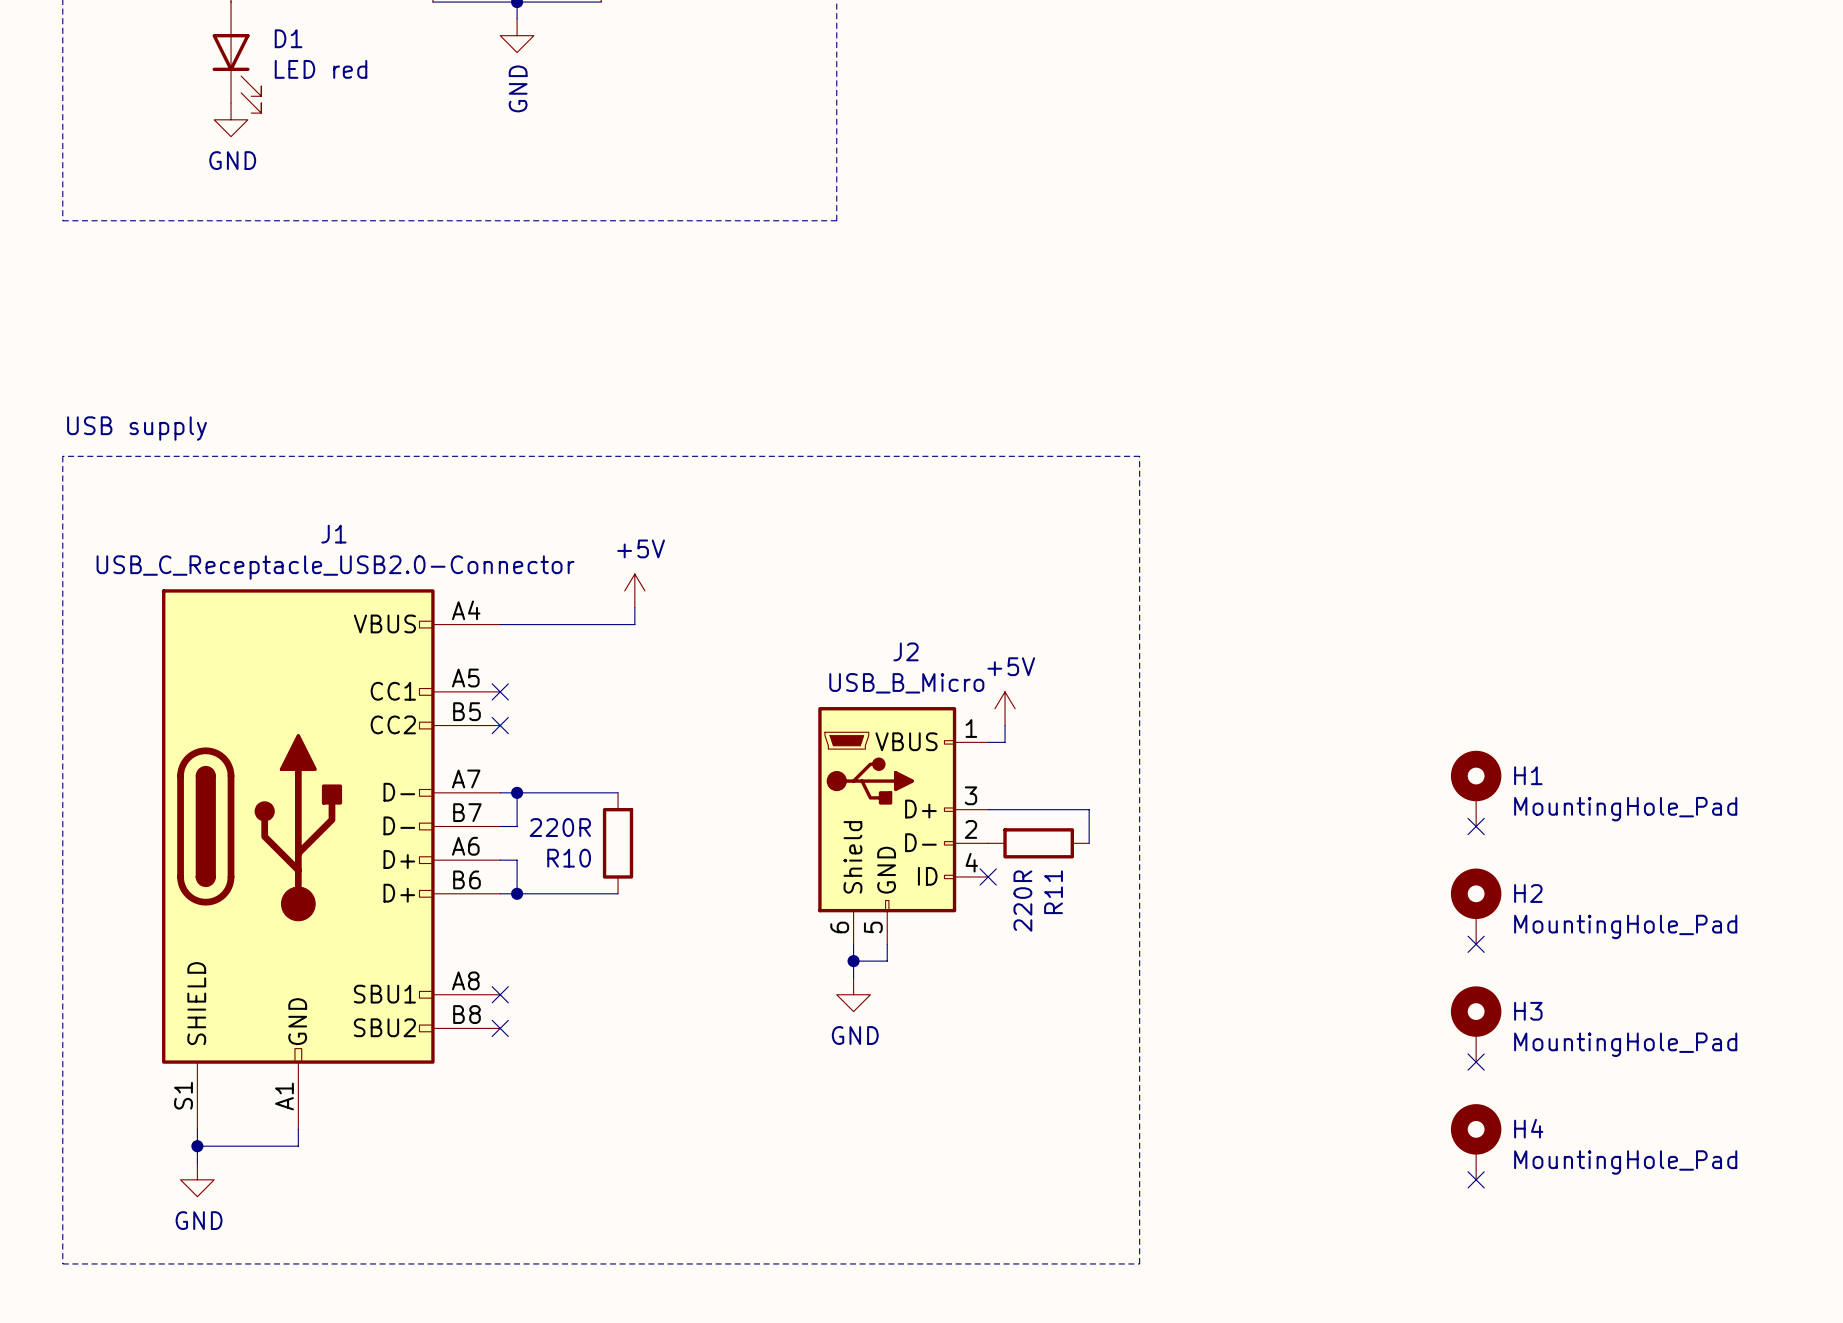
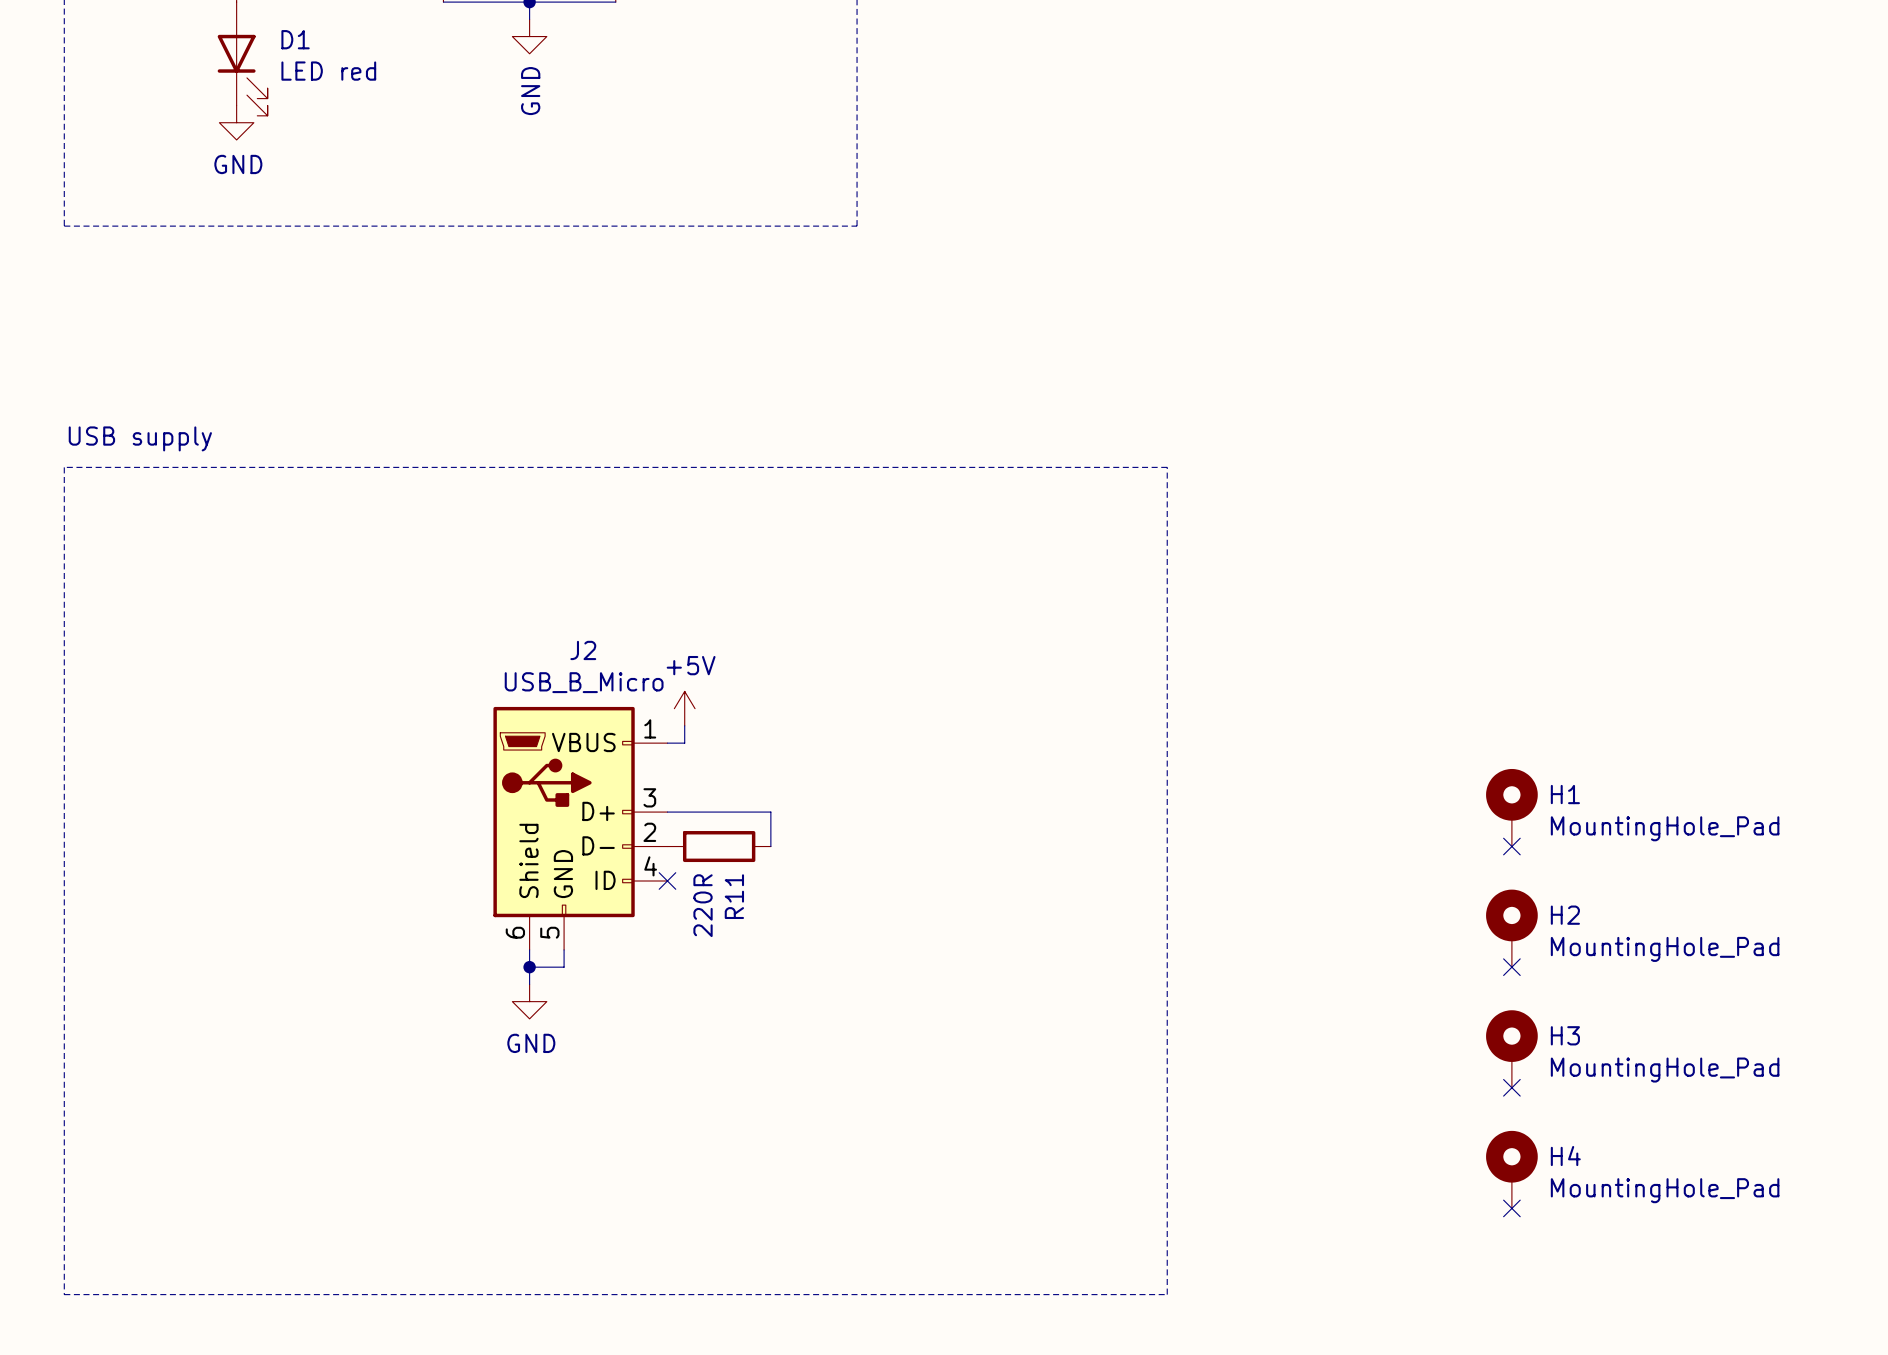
power symbol position: +5V (634, 590) -> +5V (684, 708)
wire: (634, 607) (634, 624) (500, 624) -> none
no-connect mark: (500, 691) -> none
wire: none -> (684, 725) (684, 743) (667, 743)
power symbol: +5V (1005, 708) -> none
no-connect mark: (500, 725) -> none
wire: (1005, 725) (1005, 742) (988, 742) -> none
junction: (517, 792) -> none
wire: none -> (667, 812) (770, 812) (770, 846)
wire: (988, 809) (1089, 809) (1089, 843) -> none
J2 position: (903, 825) -> (580, 828)
R10: 220R (618, 843) -> none
R11 position: (1038, 843) -> (719, 846)
J1: USB_C_Receptacle_USB2.0-Connector (331, 859) -> none
no-connect mark: none -> (667, 881)
no-connect mark: (988, 876) -> none
junction position: (517, 893) -> (529, 967)
wire: none -> (529, 949) (529, 984)
wire: none -> (564, 949) (564, 967) (529, 967)
wire: (853, 944) (853, 977) -> none
wire: (887, 944) (887, 961) (853, 961) -> none
junction: (853, 961) -> none
power symbol: none -> GND (529, 1001)
no-connect mark: (500, 994) -> none
power symbol: GND (853, 994) -> none
no-connect mark: (500, 1028) -> none
wire: (197, 1129) (197, 1163) -> none
wire: (298, 1129) (298, 1146) (197, 1146) -> none
junction: (197, 1146) -> none
power symbol: GND (197, 1179) -> none

